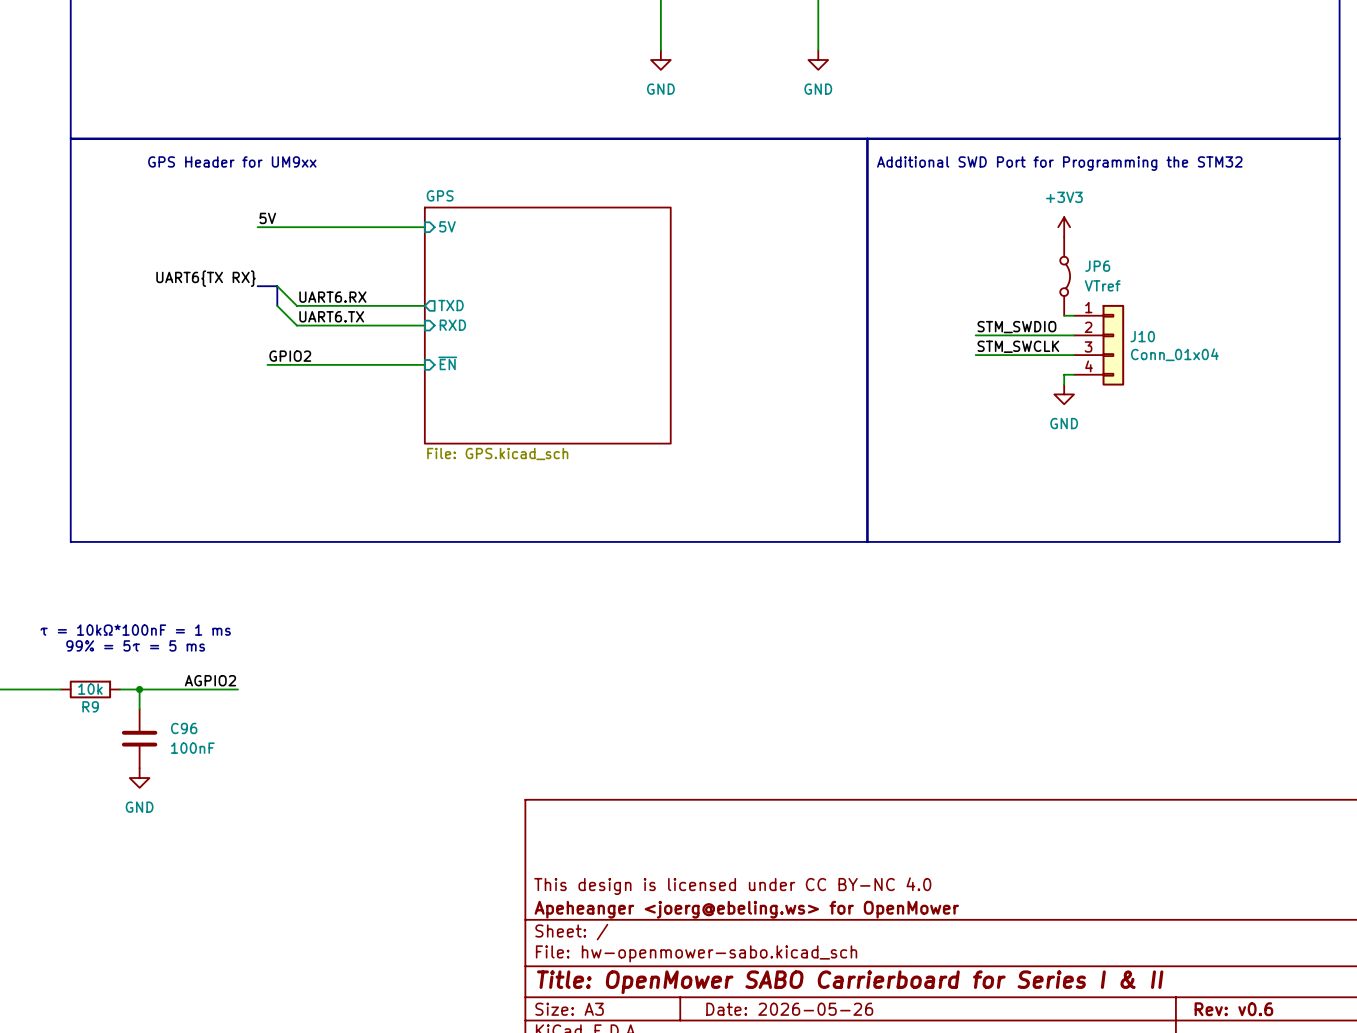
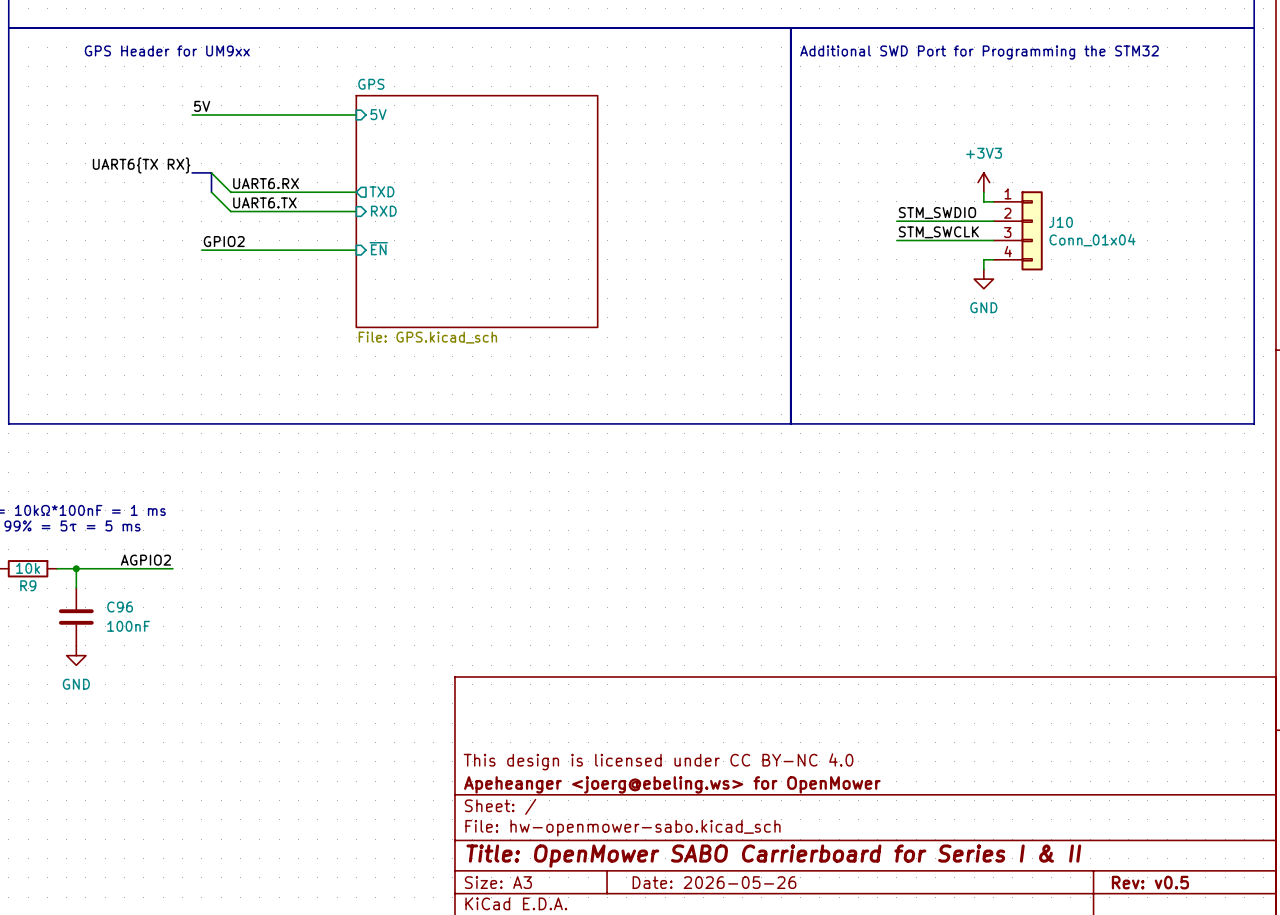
power symbol position: +3V3 (1064, 227) -> +3V3 (983, 182)
JP6: VTref (1065, 276) -> none
title block: Rev: v0.6 (1233, 1009) -> Rev: v0.5 (1150, 882)

